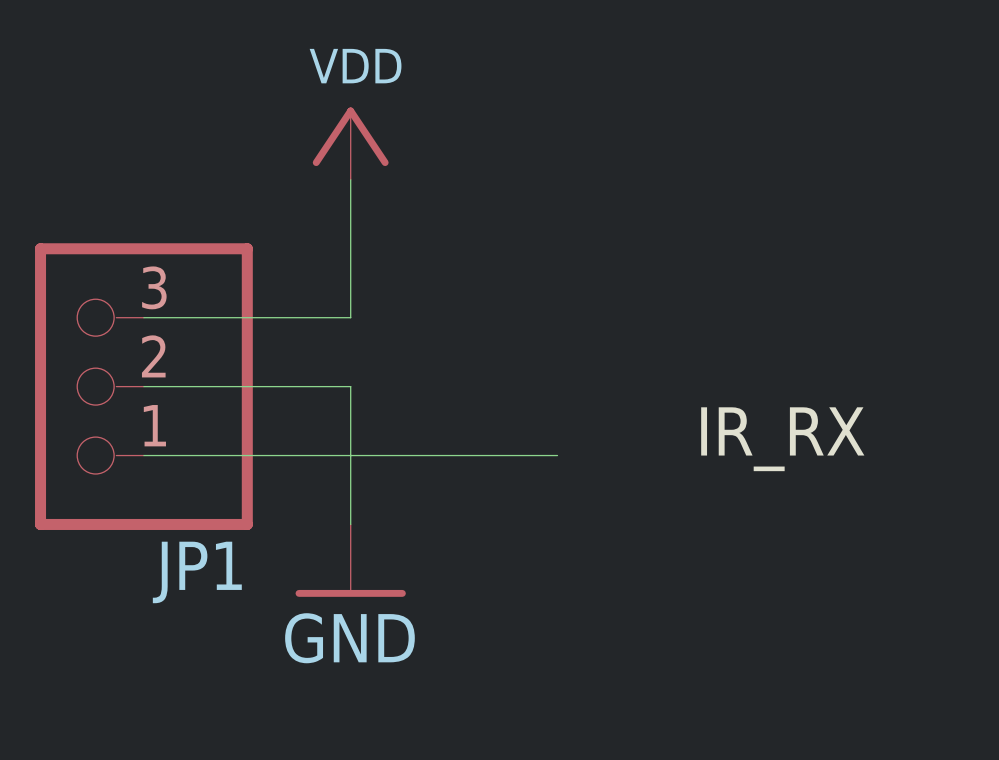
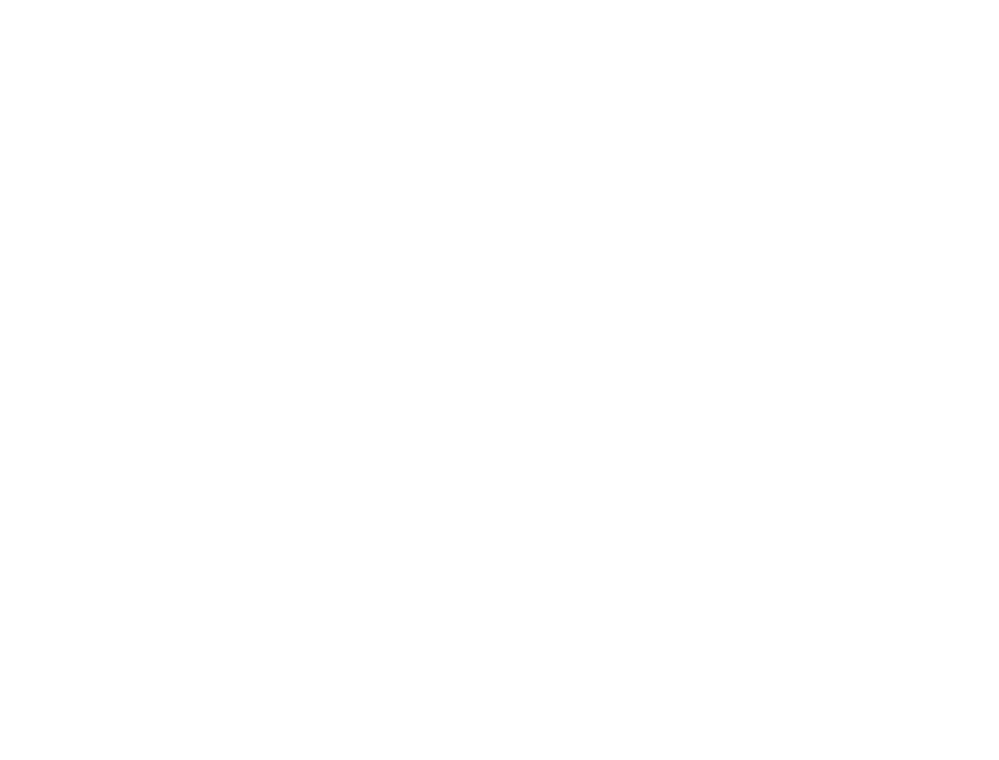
power symbol: VDD (350, 143) -> none
wire: (350, 179) (350, 317) (143, 317) -> none
wire: (143, 386) (350, 386) (350, 524) -> none
JP1: (143, 386) -> none
label: IR_RX (782, 439) -> none
wire: (143, 455) (557, 455) -> none
power symbol: GND (350, 560) -> none

